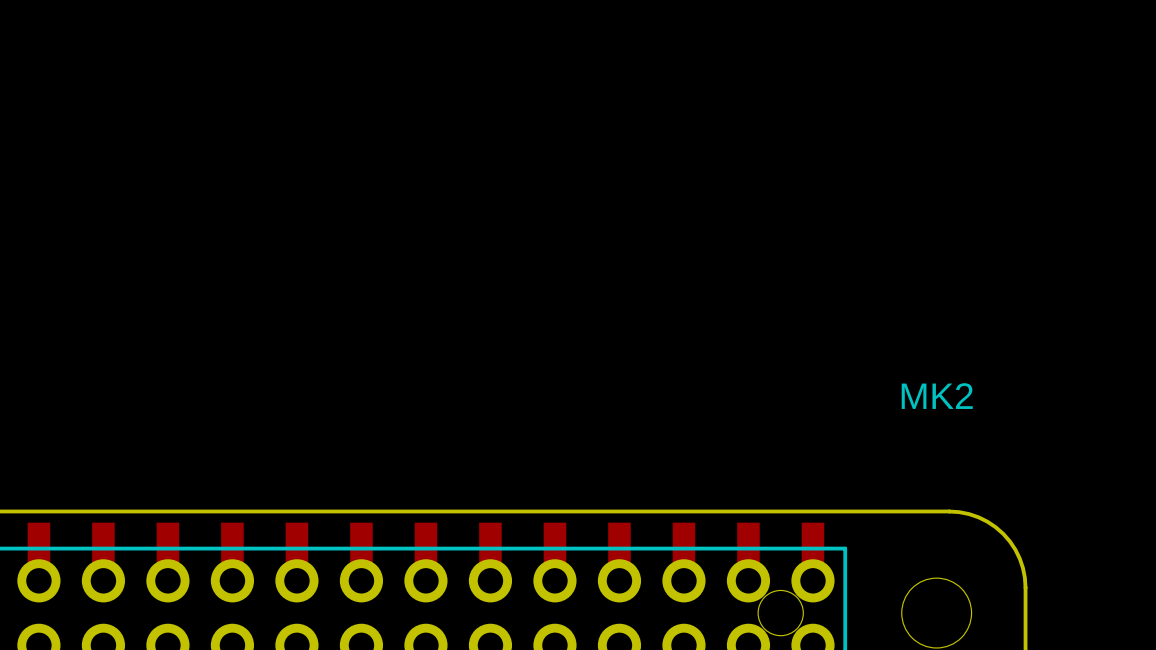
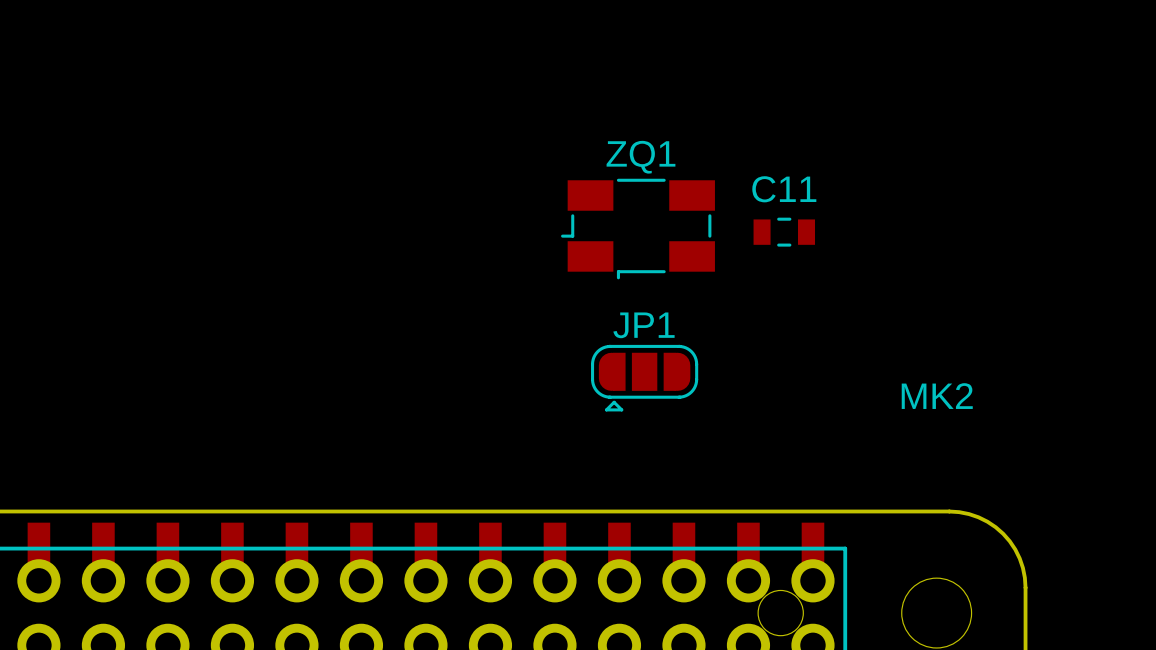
ZQ1: none -> (638, 229)
C11: none -> (784, 232)
JP1: none -> (644, 378)

